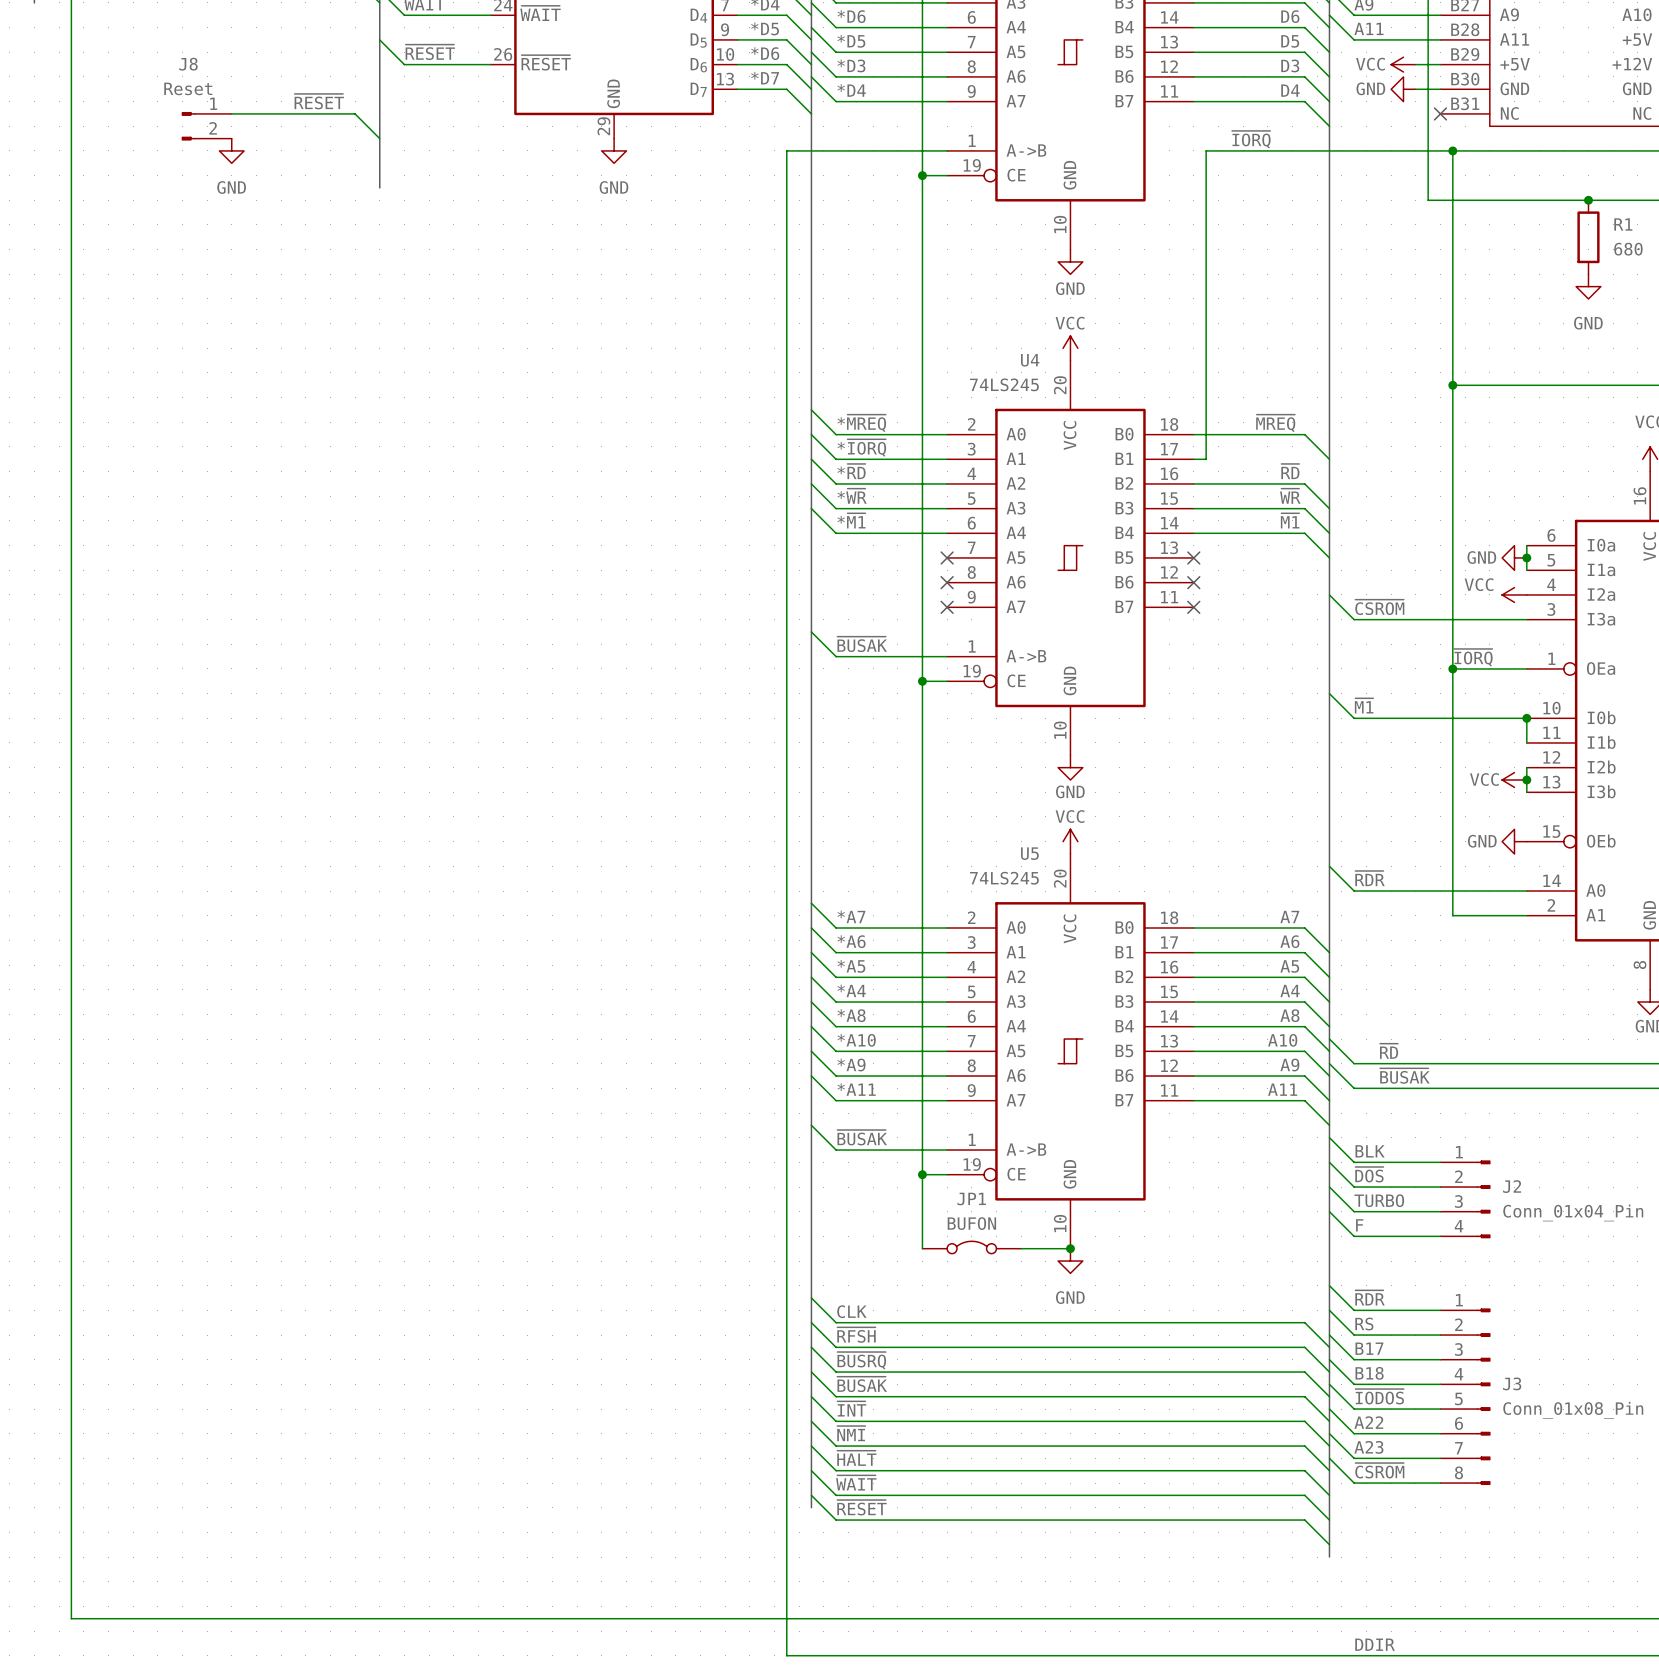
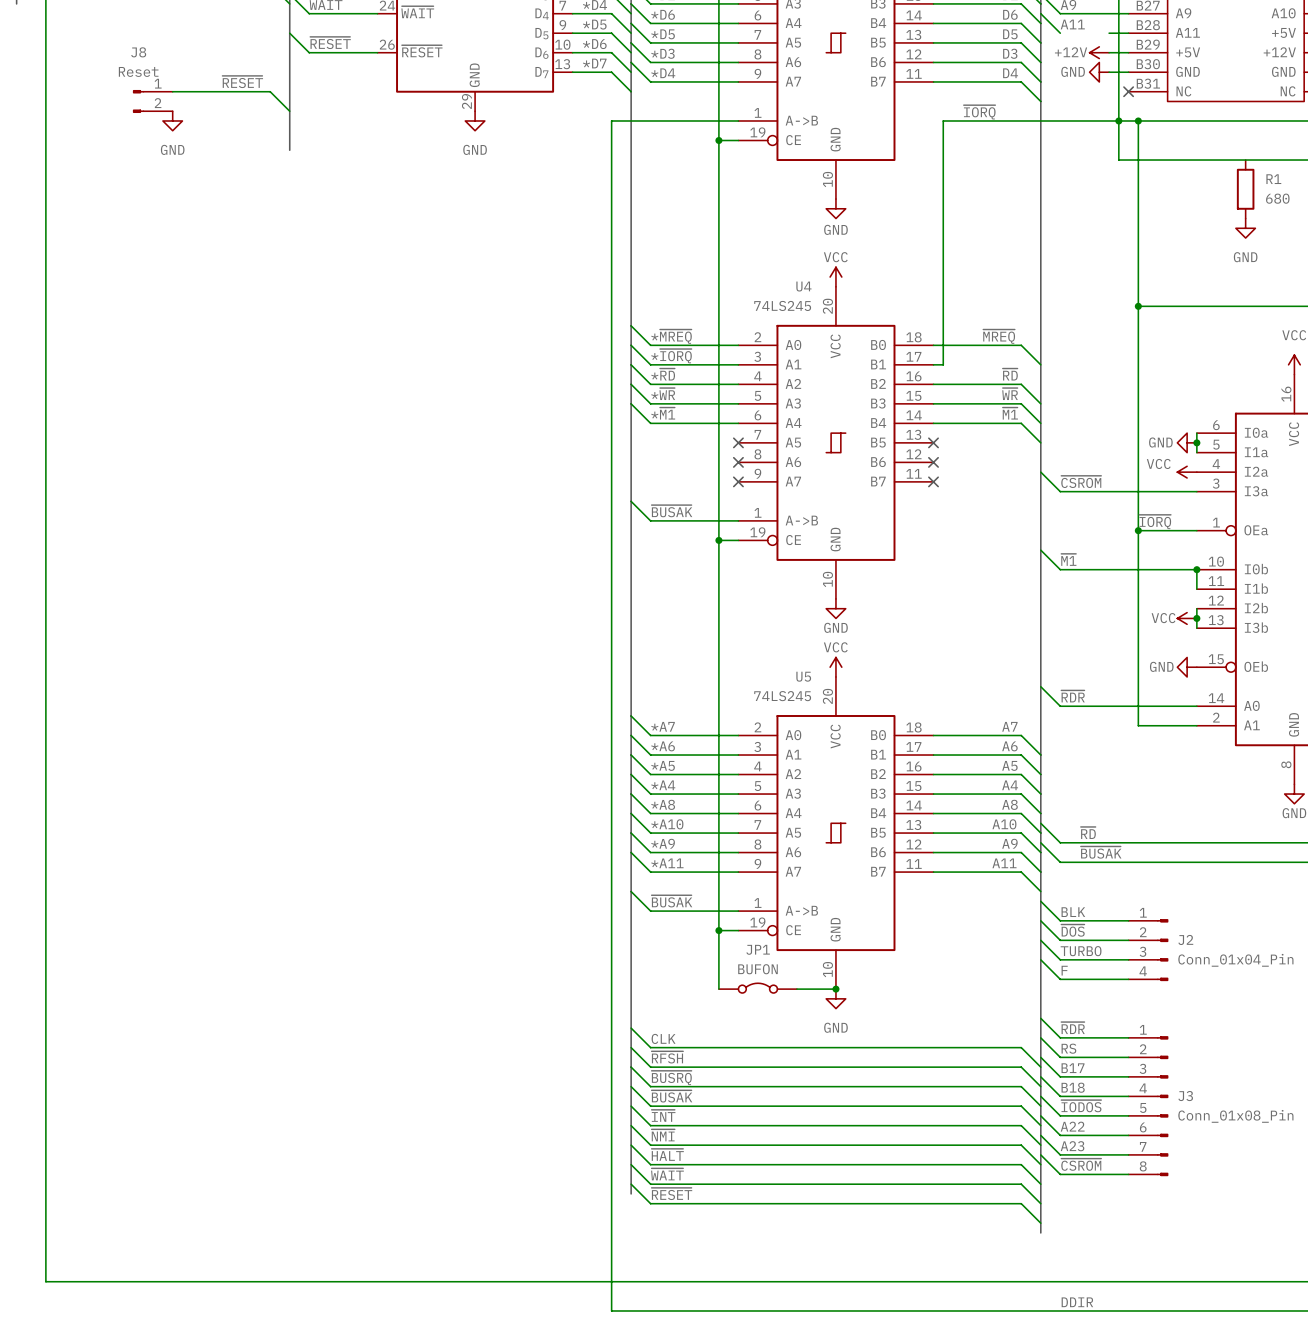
wire: (1354, 39) (1415, 39) -> none
power symbol: VCC (1403, 64) -> +12V (1099, 52)
junction: none -> (1118, 120)
junction: (1588, 200) -> none

